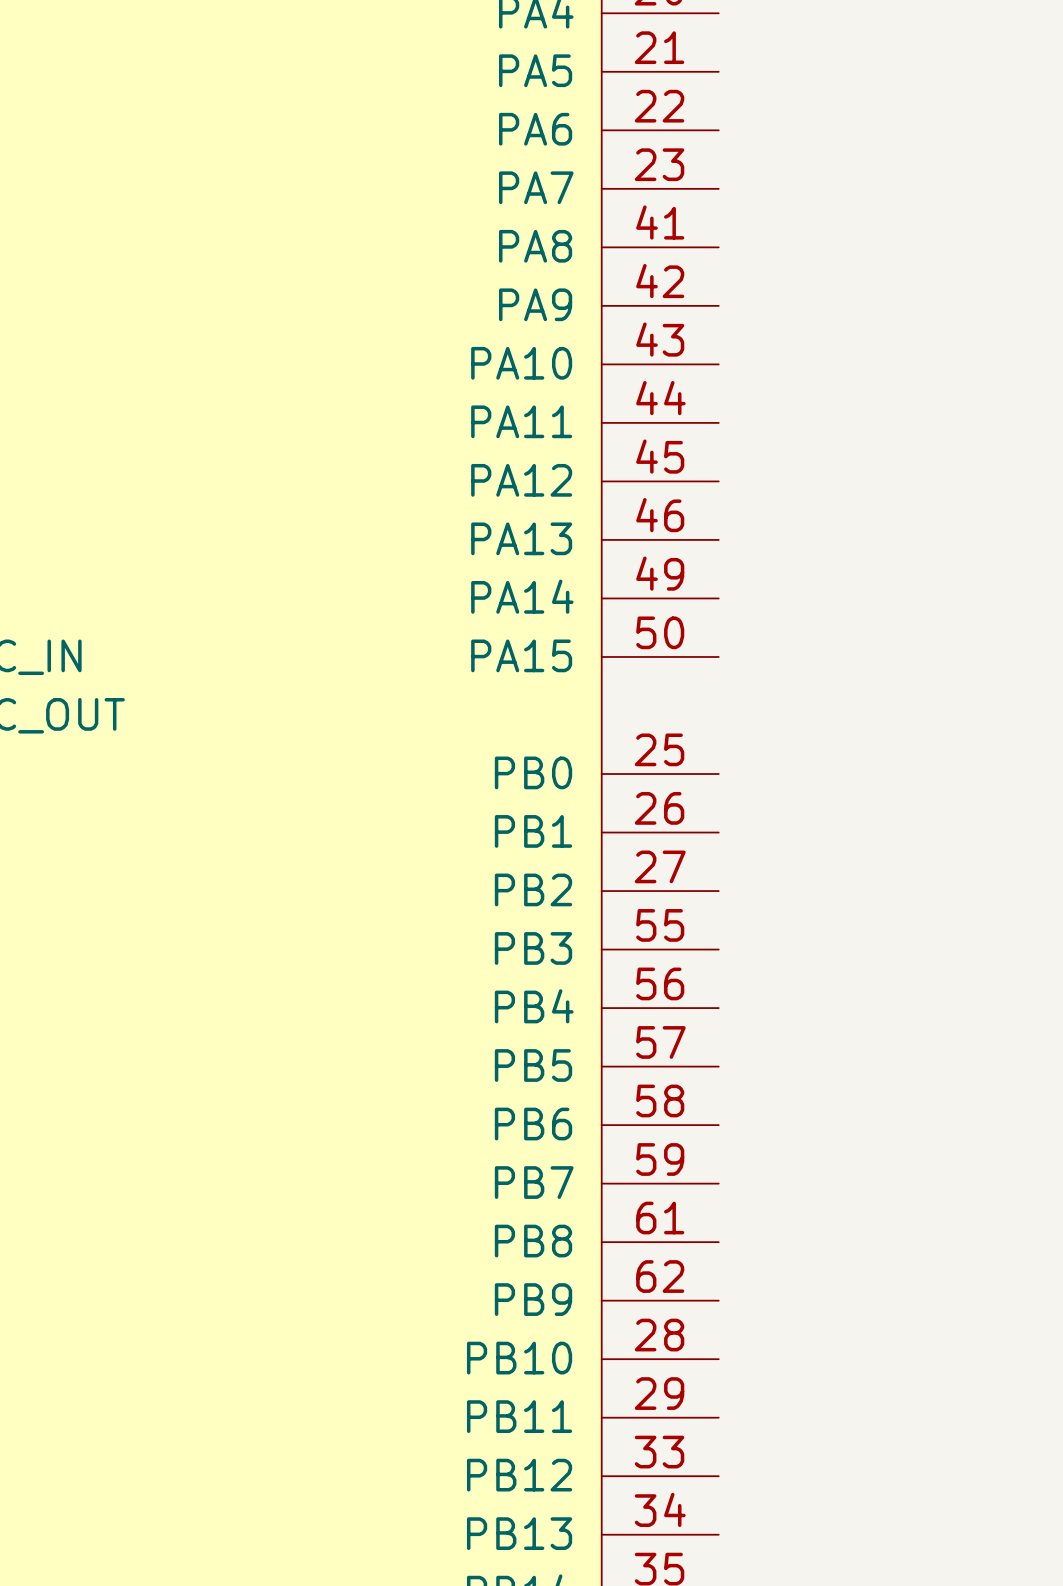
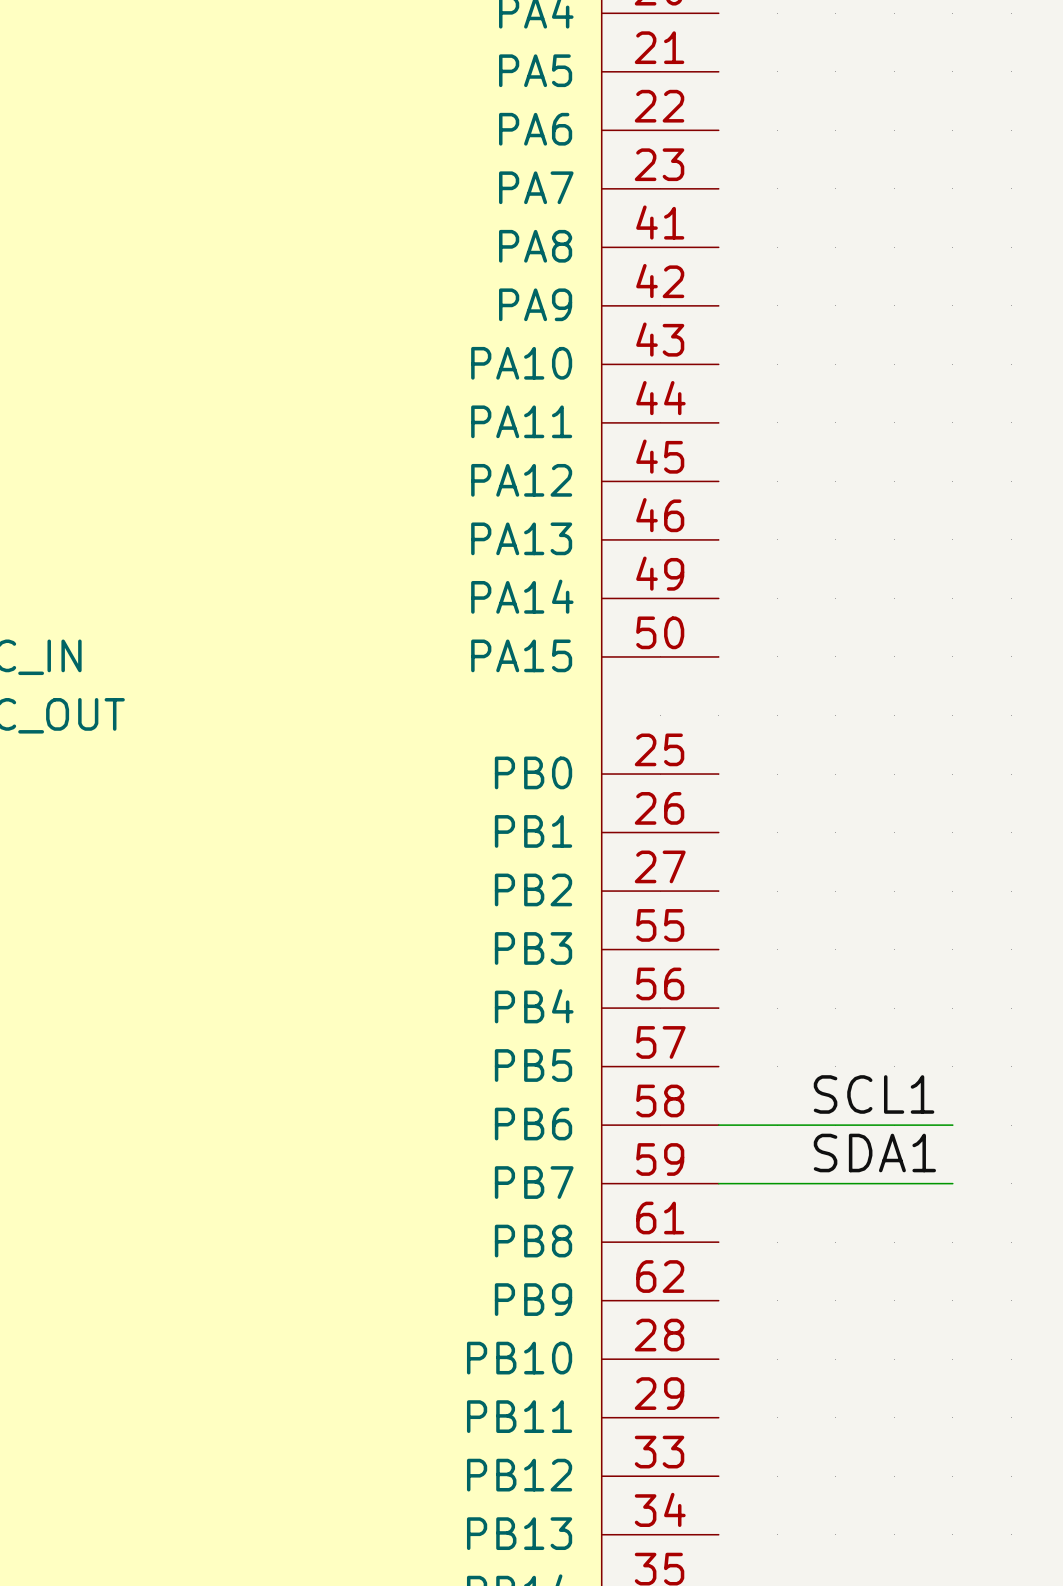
label: none -> SCL1 (874, 1094)
wire: none -> (718, 1125) (952, 1125)
label: none -> SDA1 (874, 1153)
wire: none -> (718, 1183) (952, 1183)

